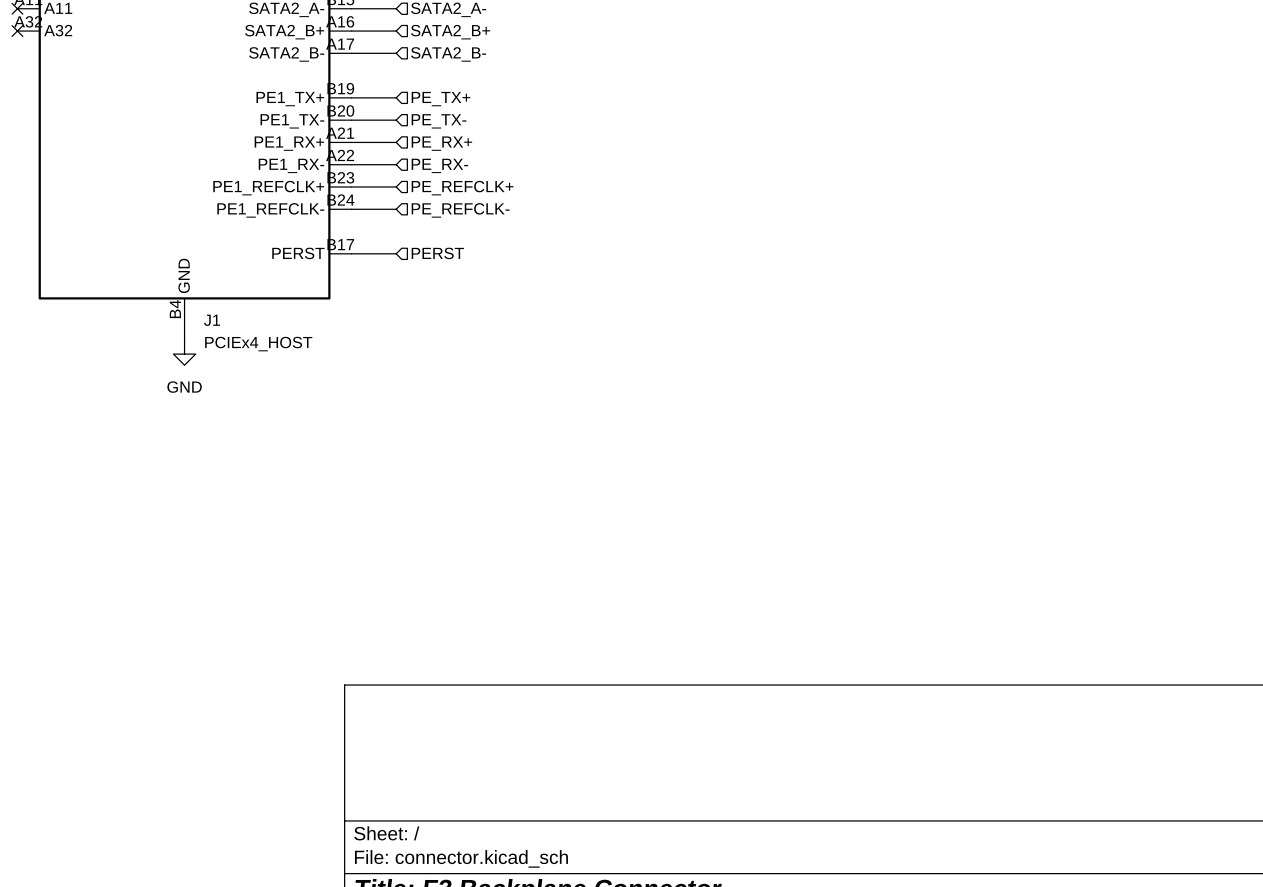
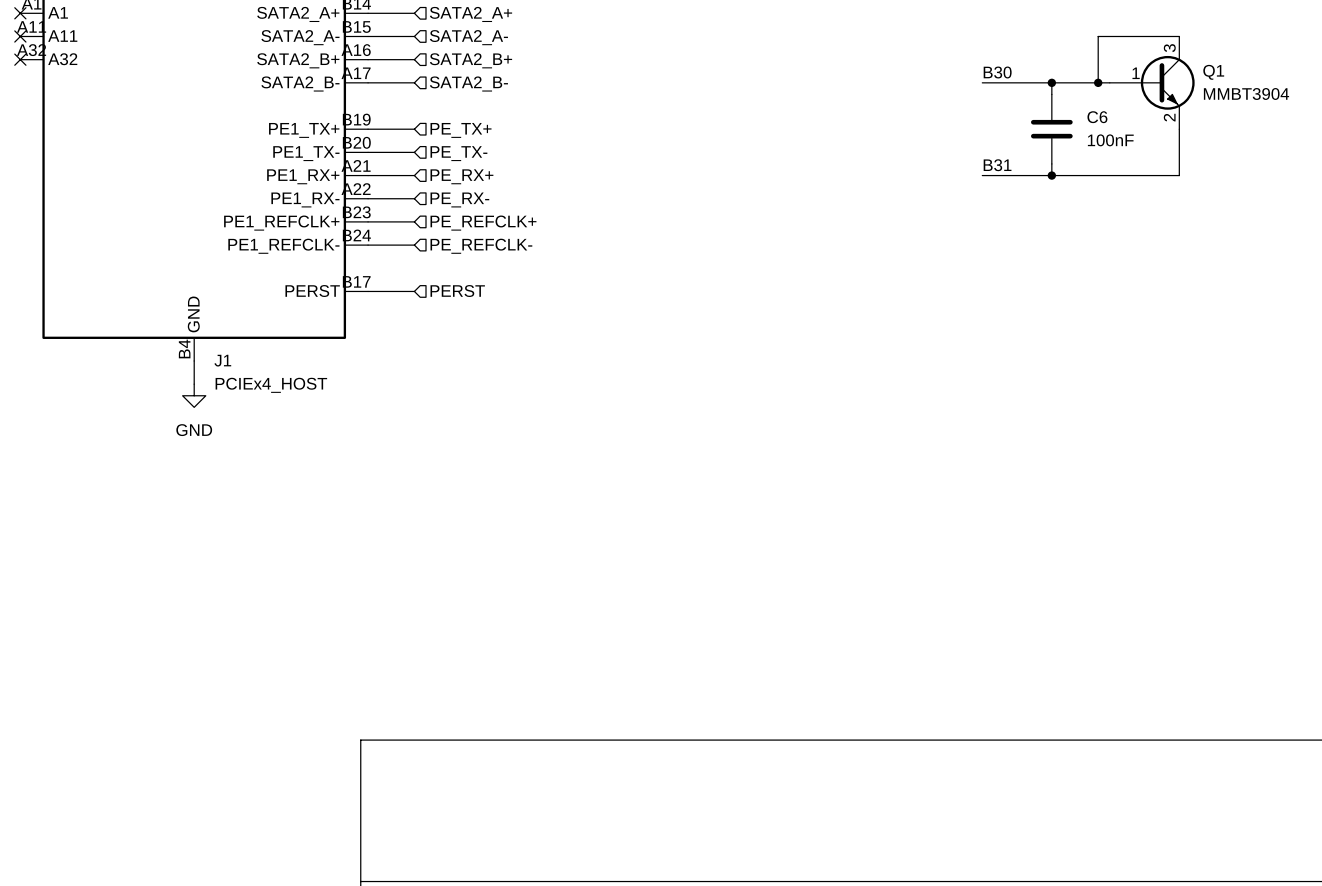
wire: none -> (1179, 36) (1098, 36) (1098, 82)
label: none -> B30 (997, 72)
wire: none -> (982, 82) (1109, 82)
wire: none -> (1051, 82) (1051, 94)
junction: none -> (1051, 82)
junction: none -> (1098, 82)
Q1: none -> MMBT3904 (1152, 82)
C6: none -> 100nF (1051, 129)
wire: none -> (1179, 129) (1179, 175) (982, 175)
wire: none -> (1051, 163) (1051, 175)
label: none -> B31 (997, 165)
junction: none -> (1051, 175)

